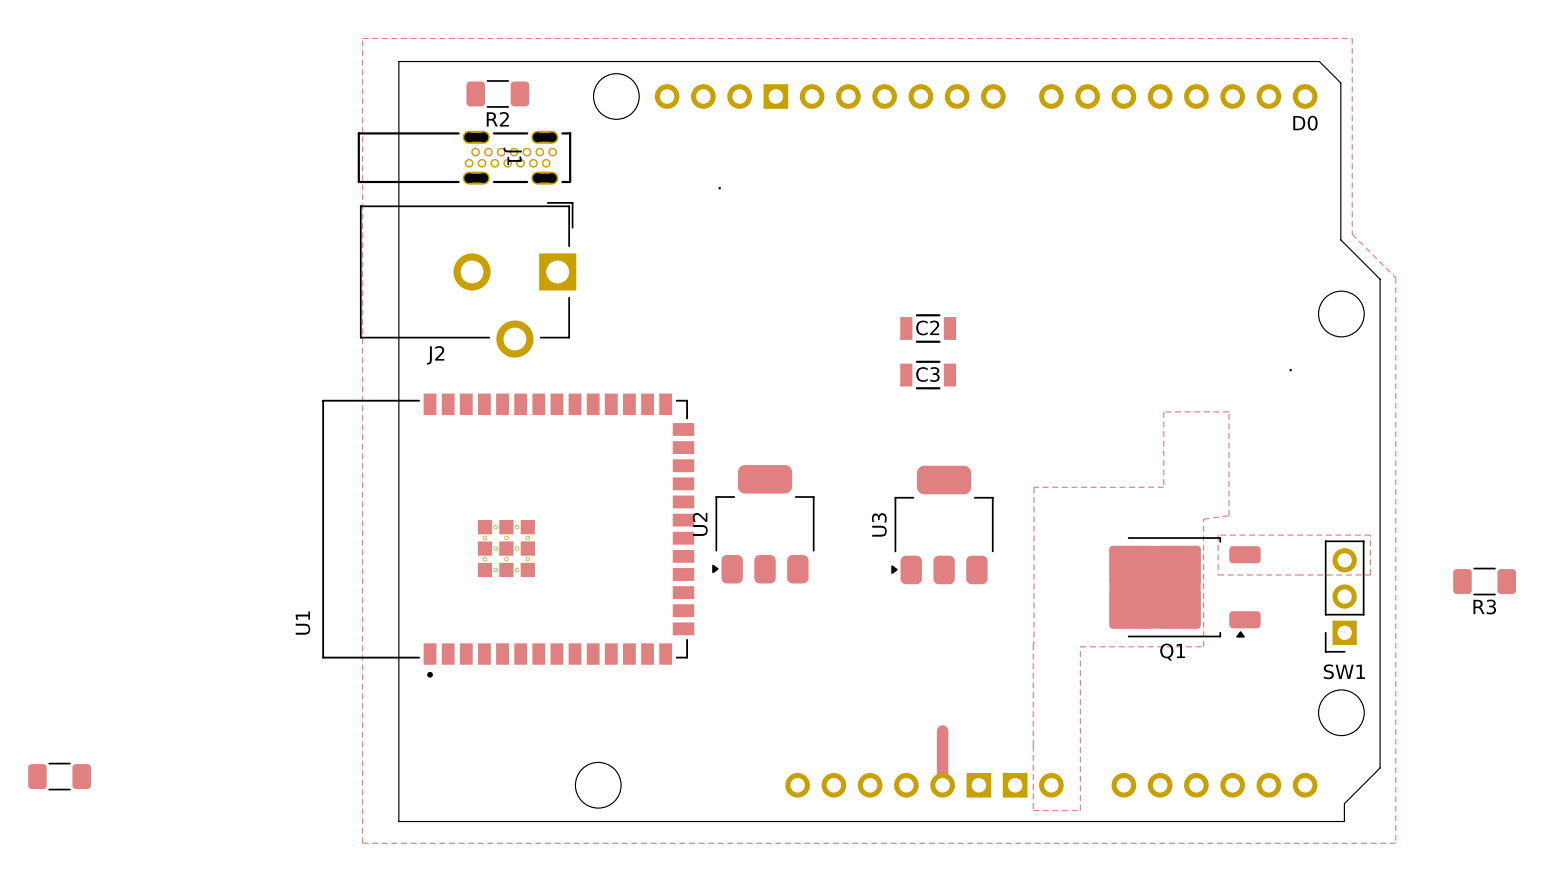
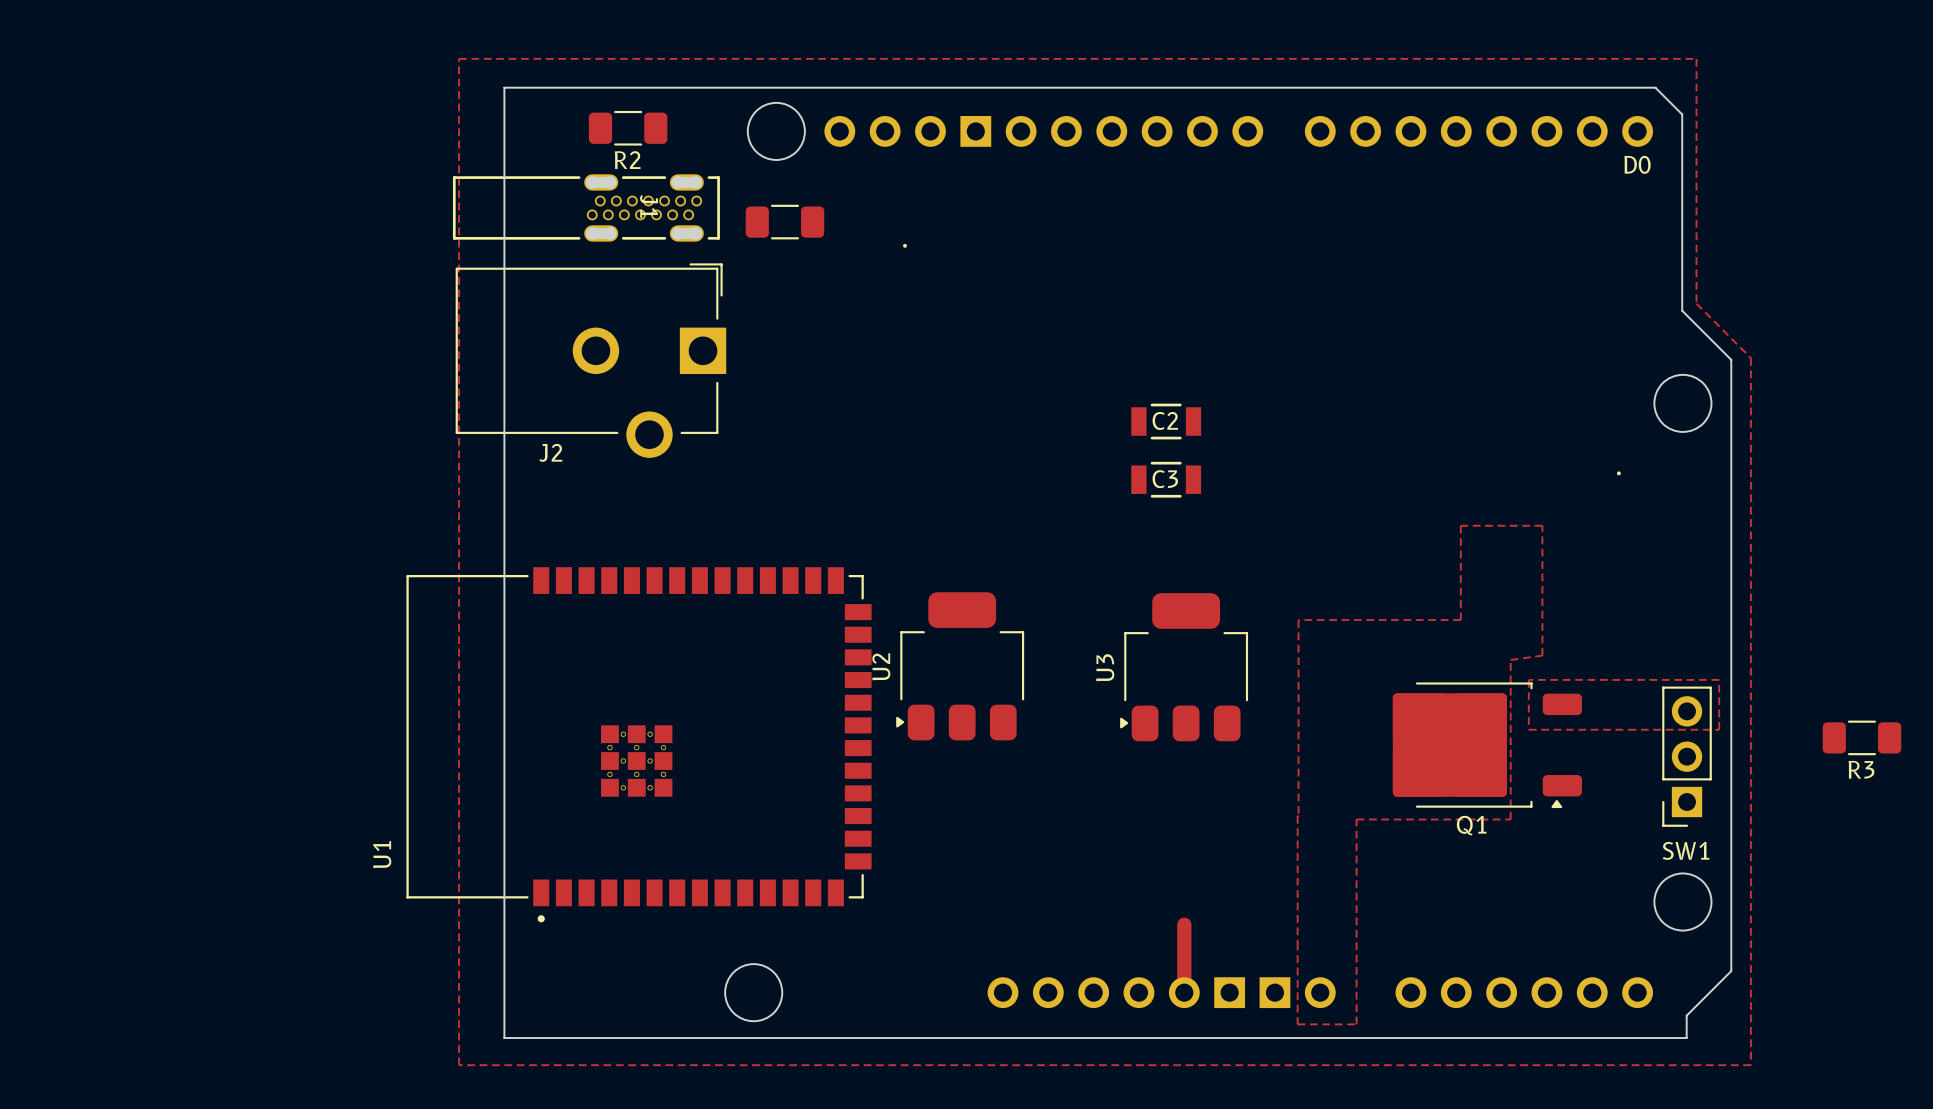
part: none -> (784, 222)
U1 position: (508, 535) -> (639, 744)
part: (59, 776) -> none

